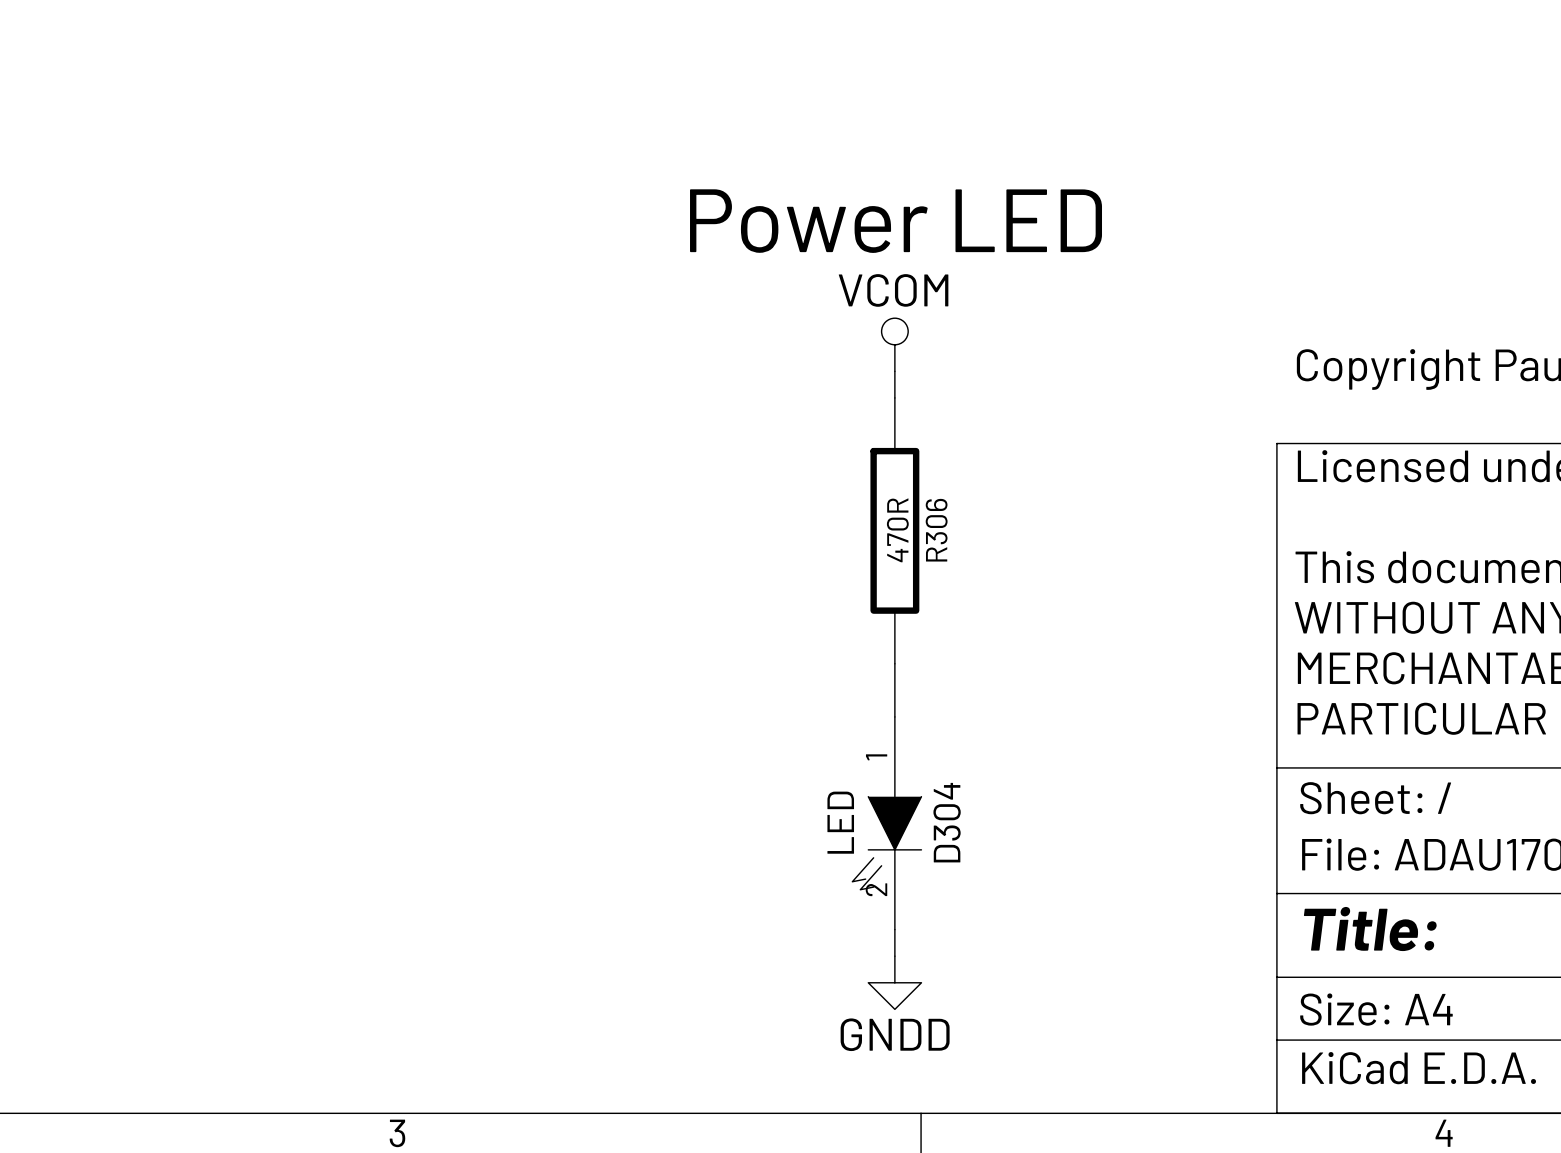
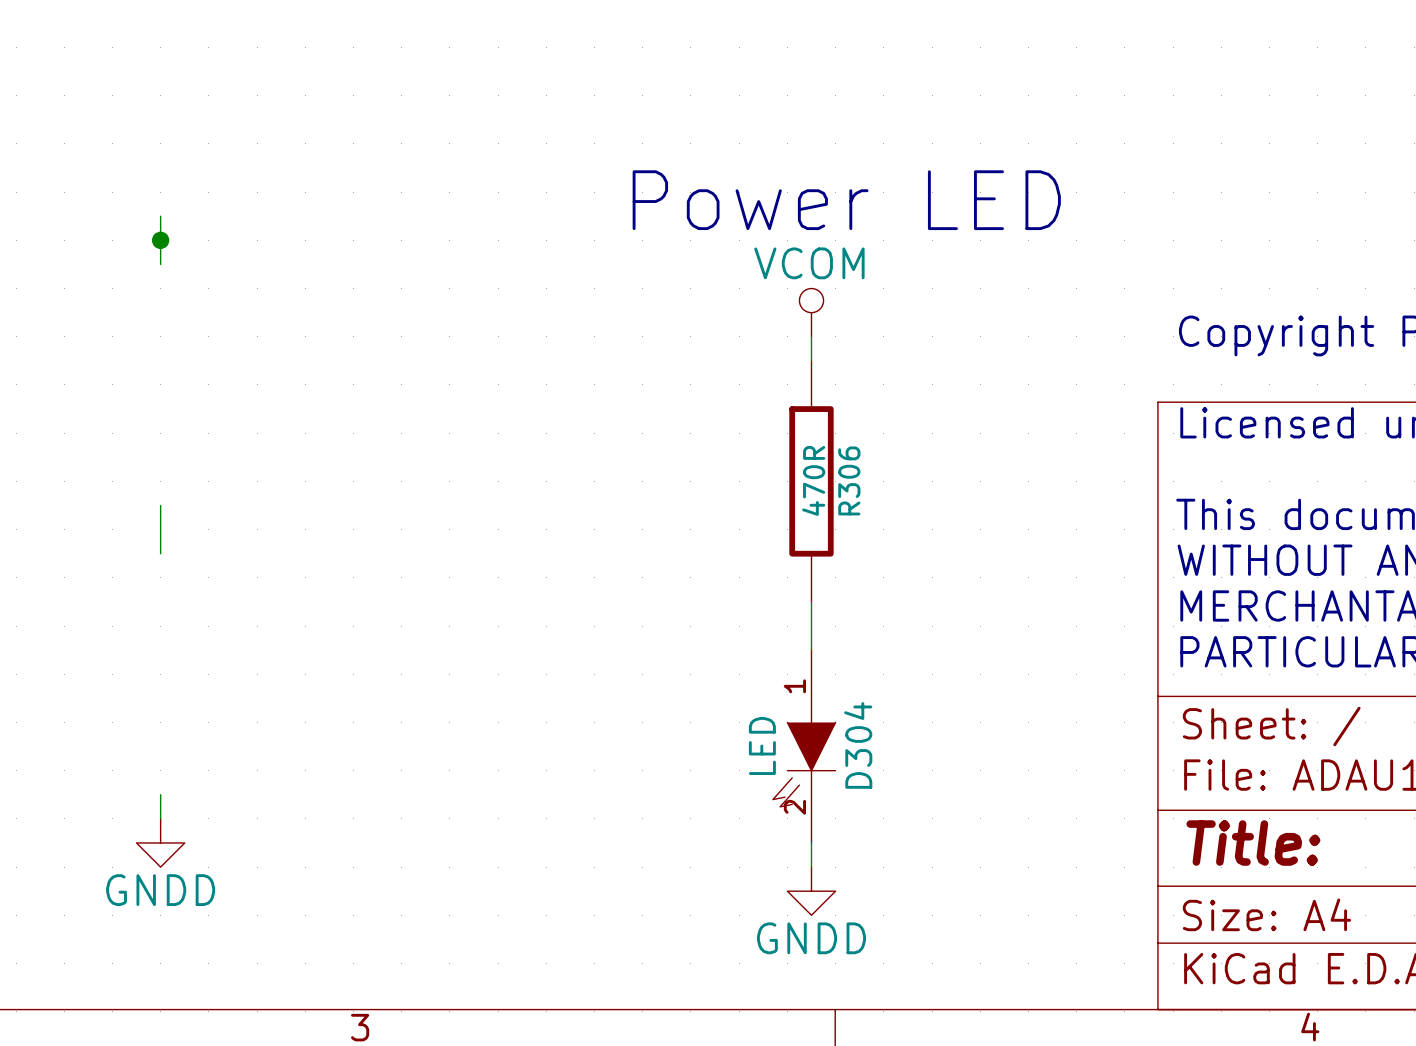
wire: none -> (160, 216) (160, 264)
junction: none -> (160, 240)
wire: none -> (160, 505) (160, 553)
wire: none -> (160, 794) (160, 818)
power symbol: none -> GNDD (160, 842)

